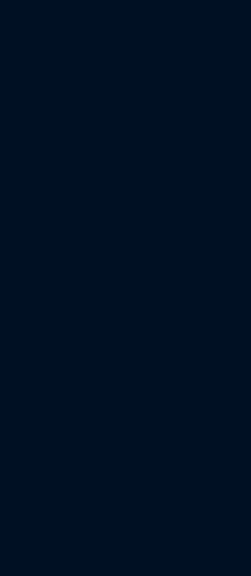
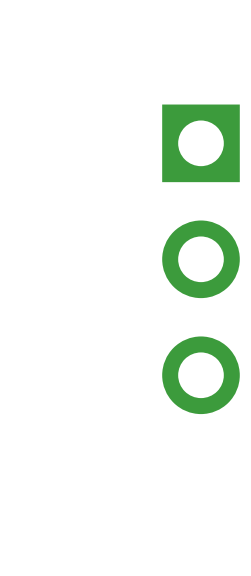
part: none -> (200, 259)

